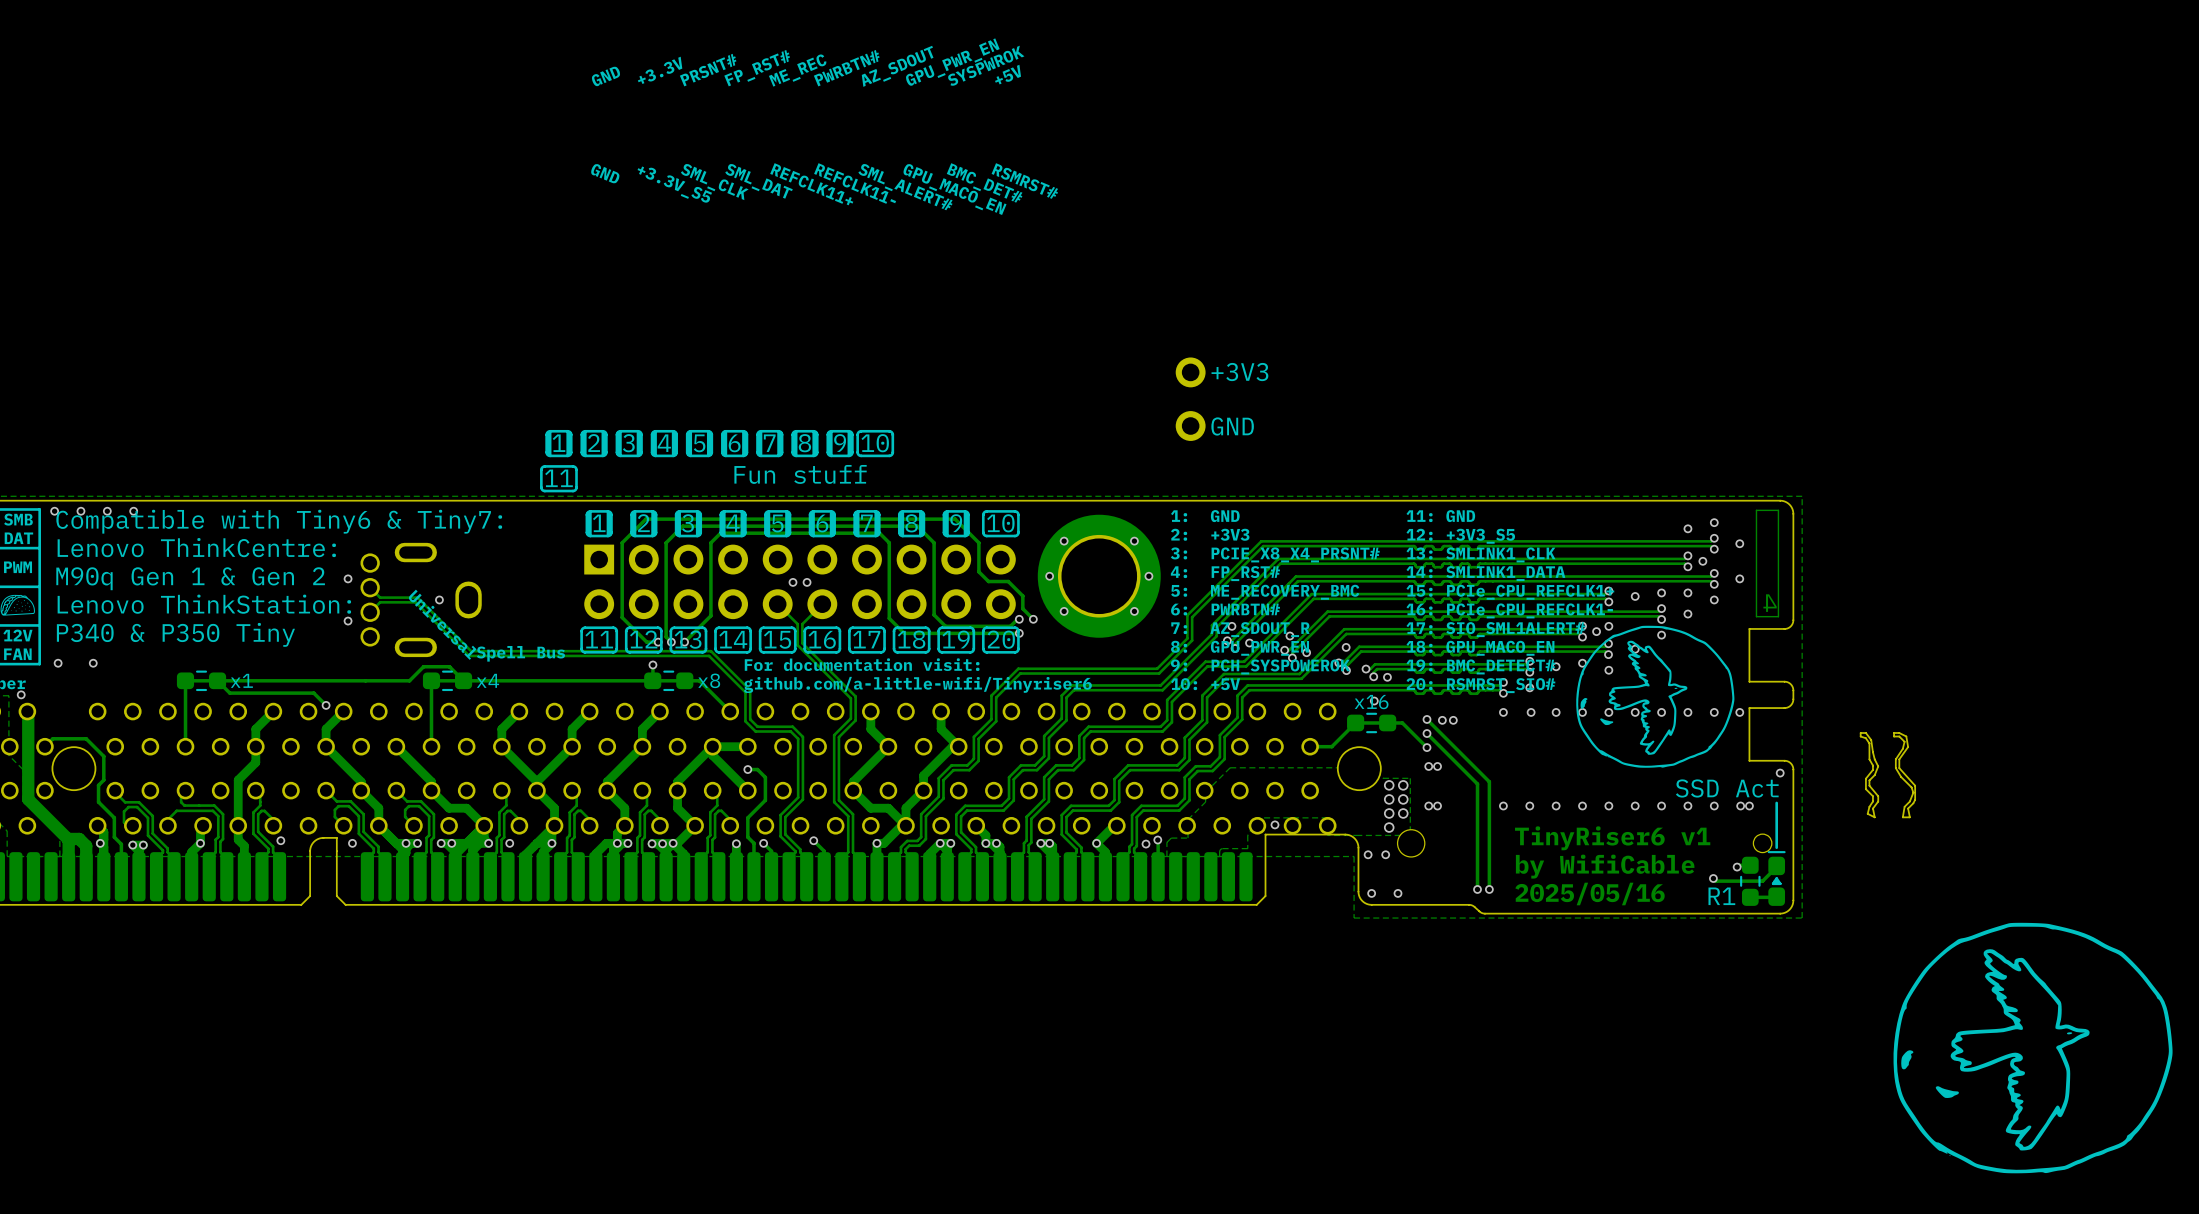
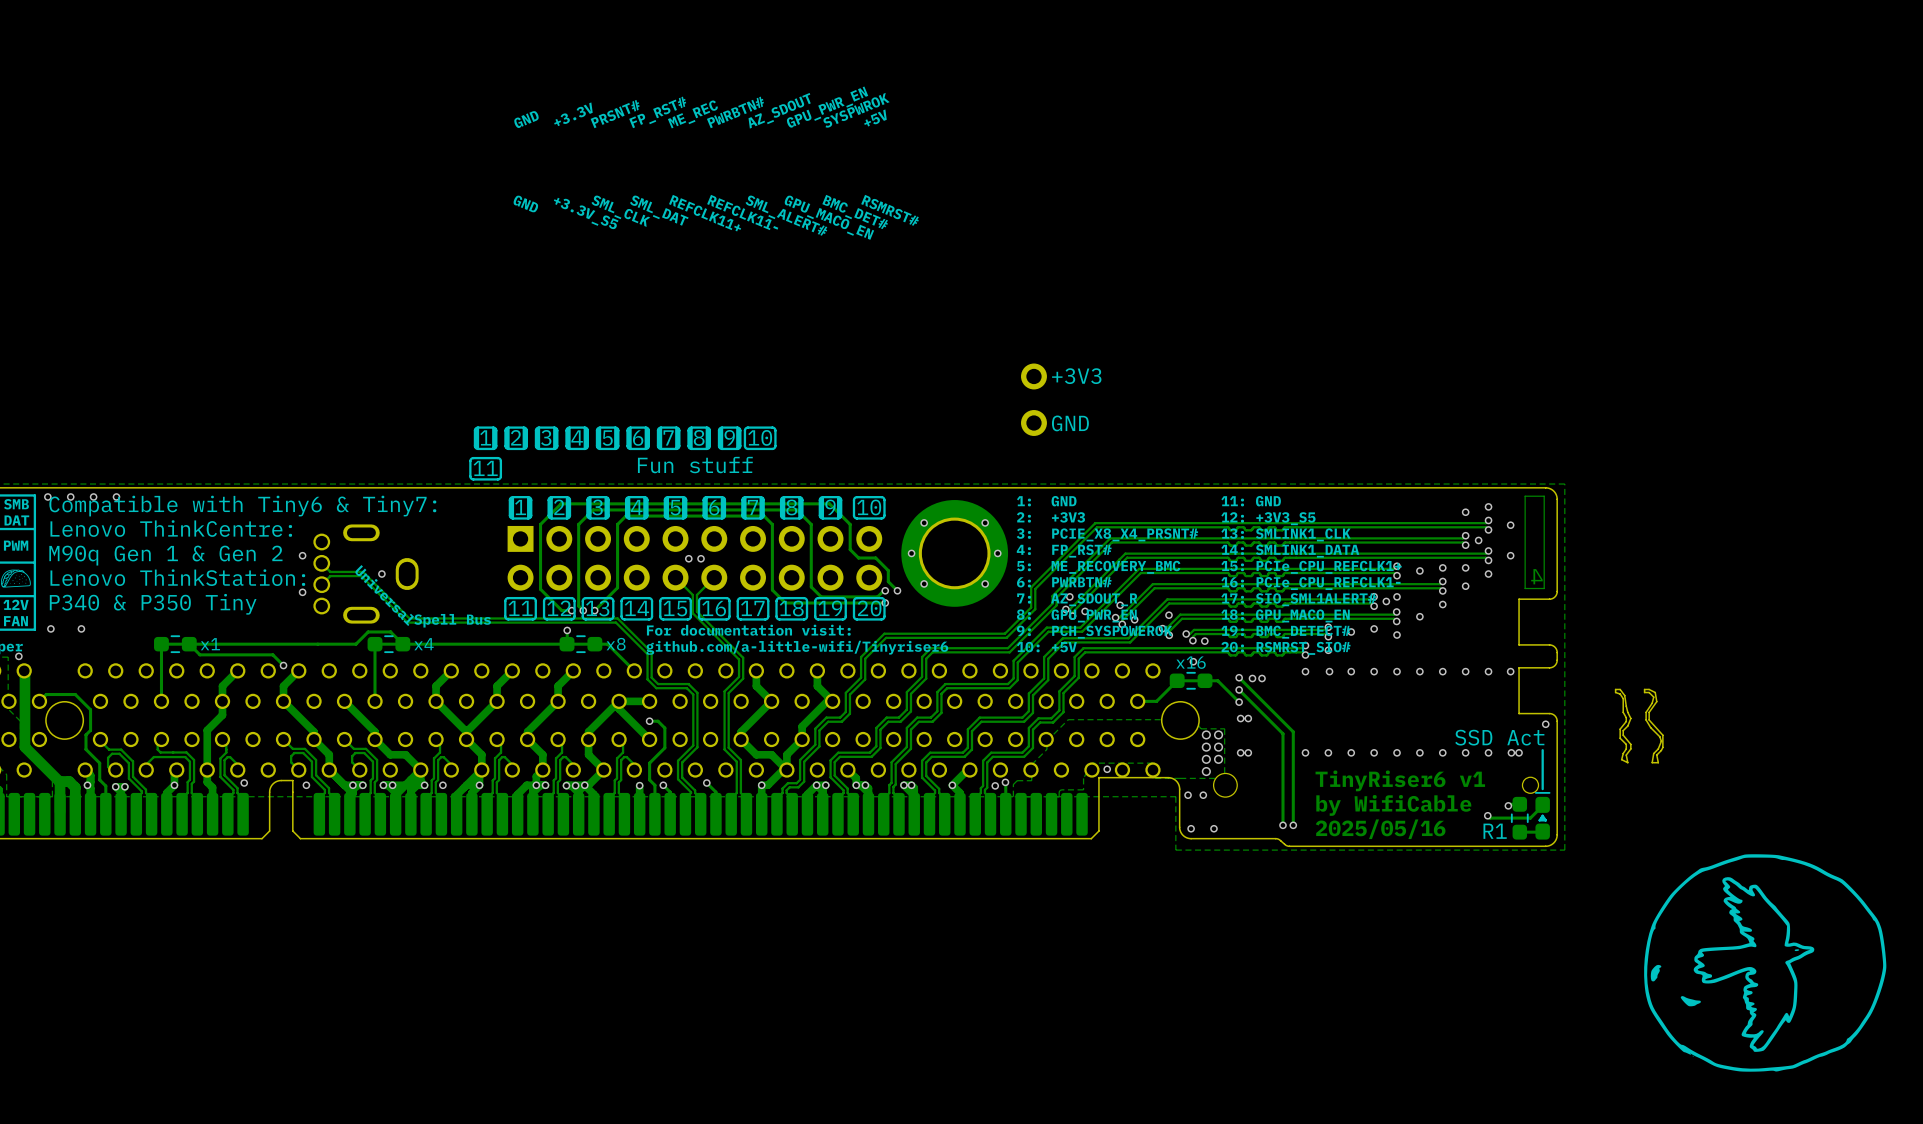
drawing: [1576, 625, 1735, 768] -> none

